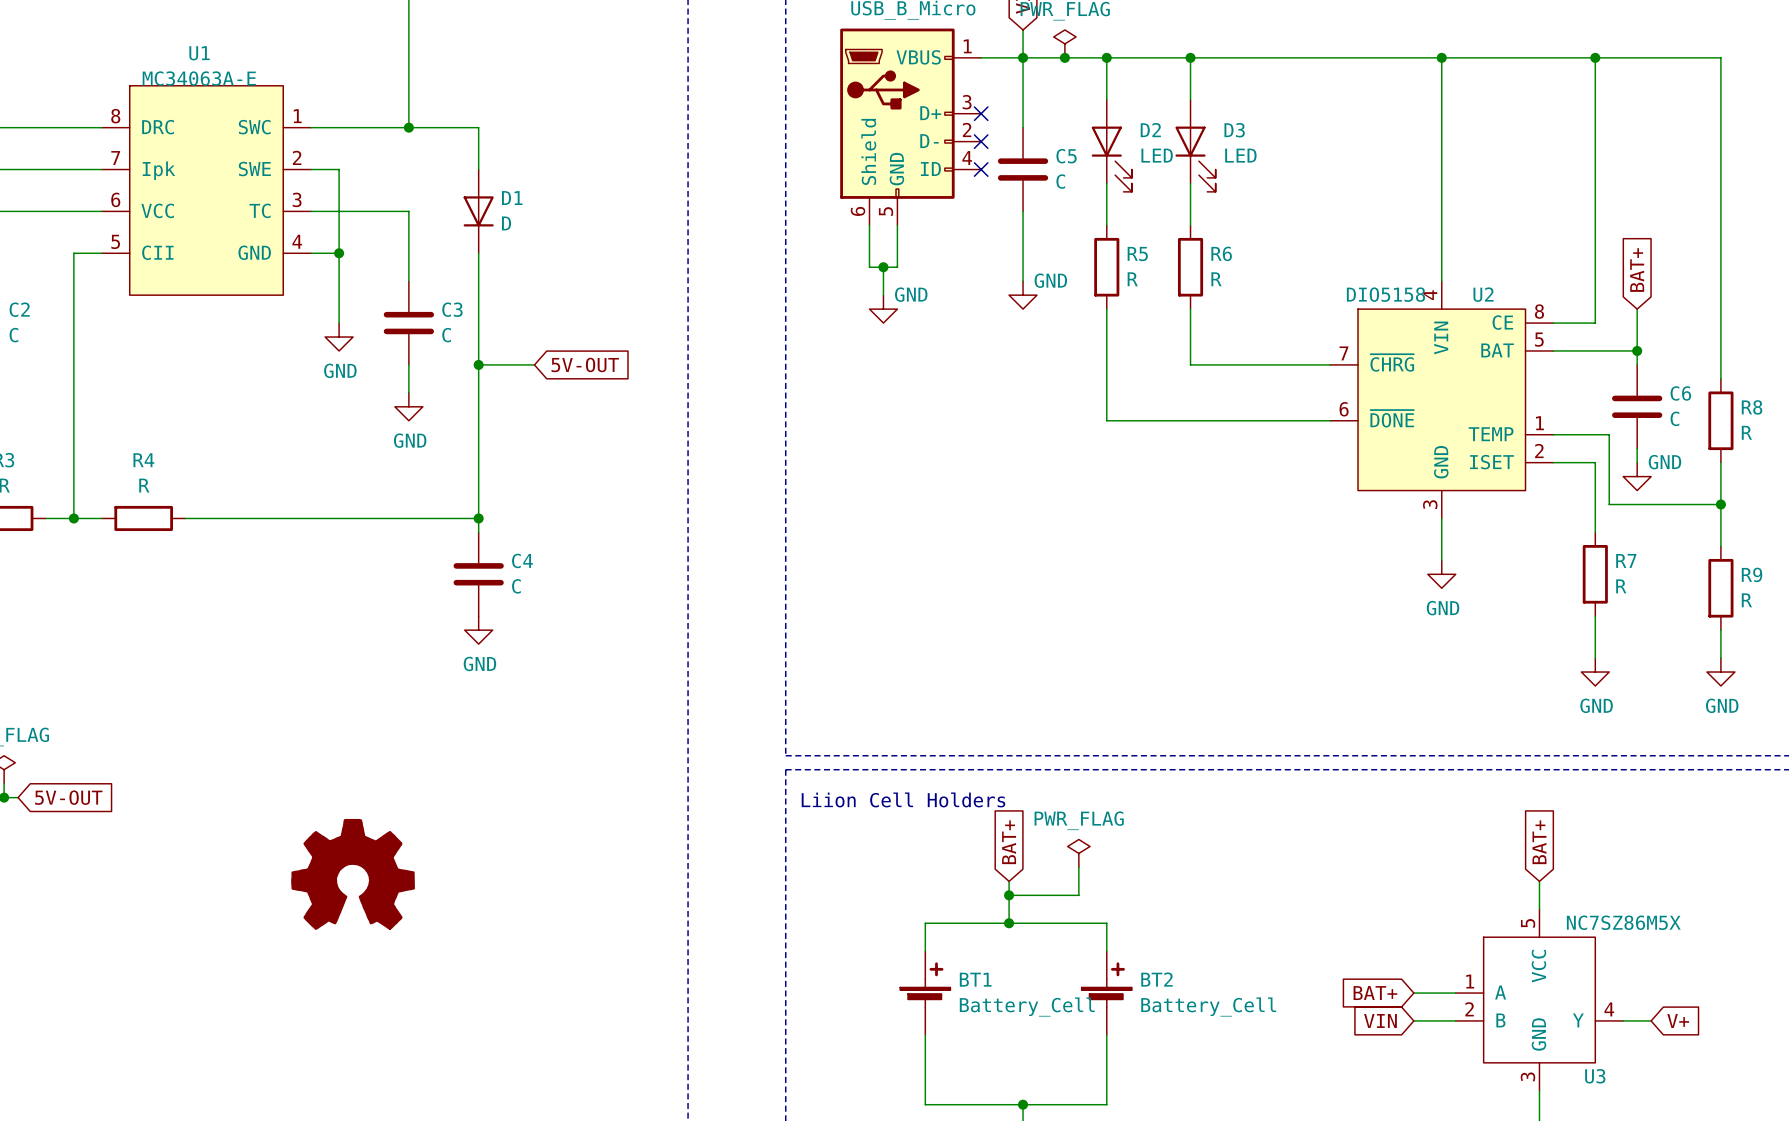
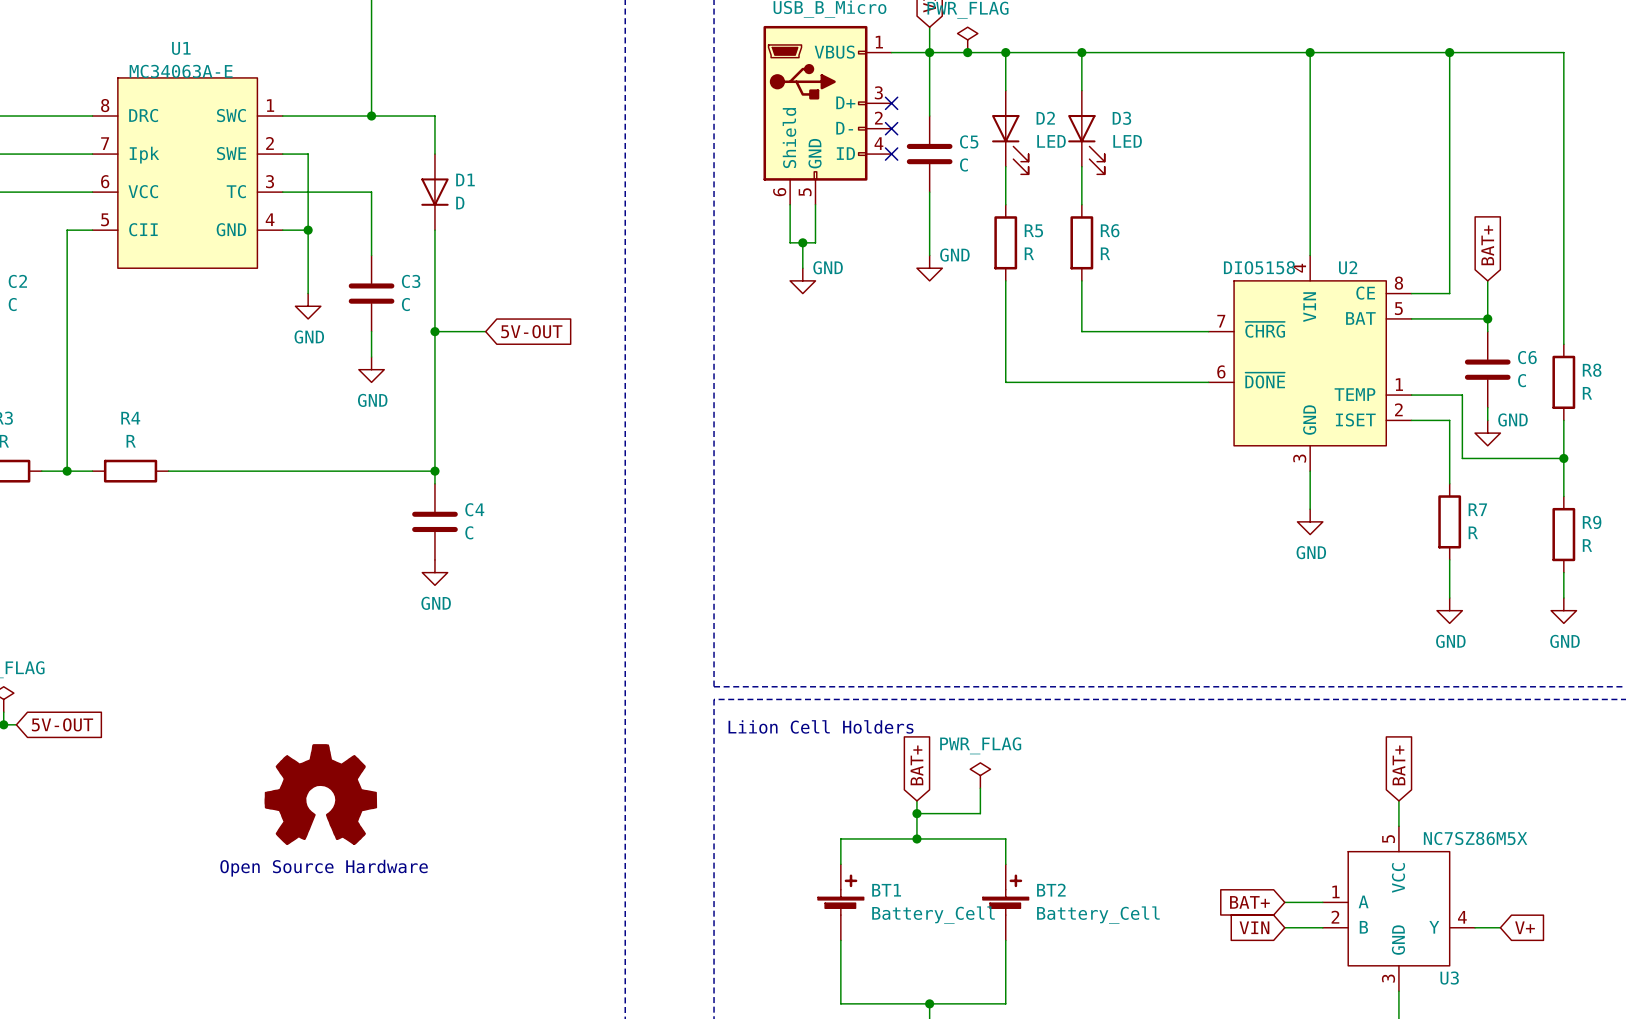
text: none -> Open Source Hardware (324, 868)

